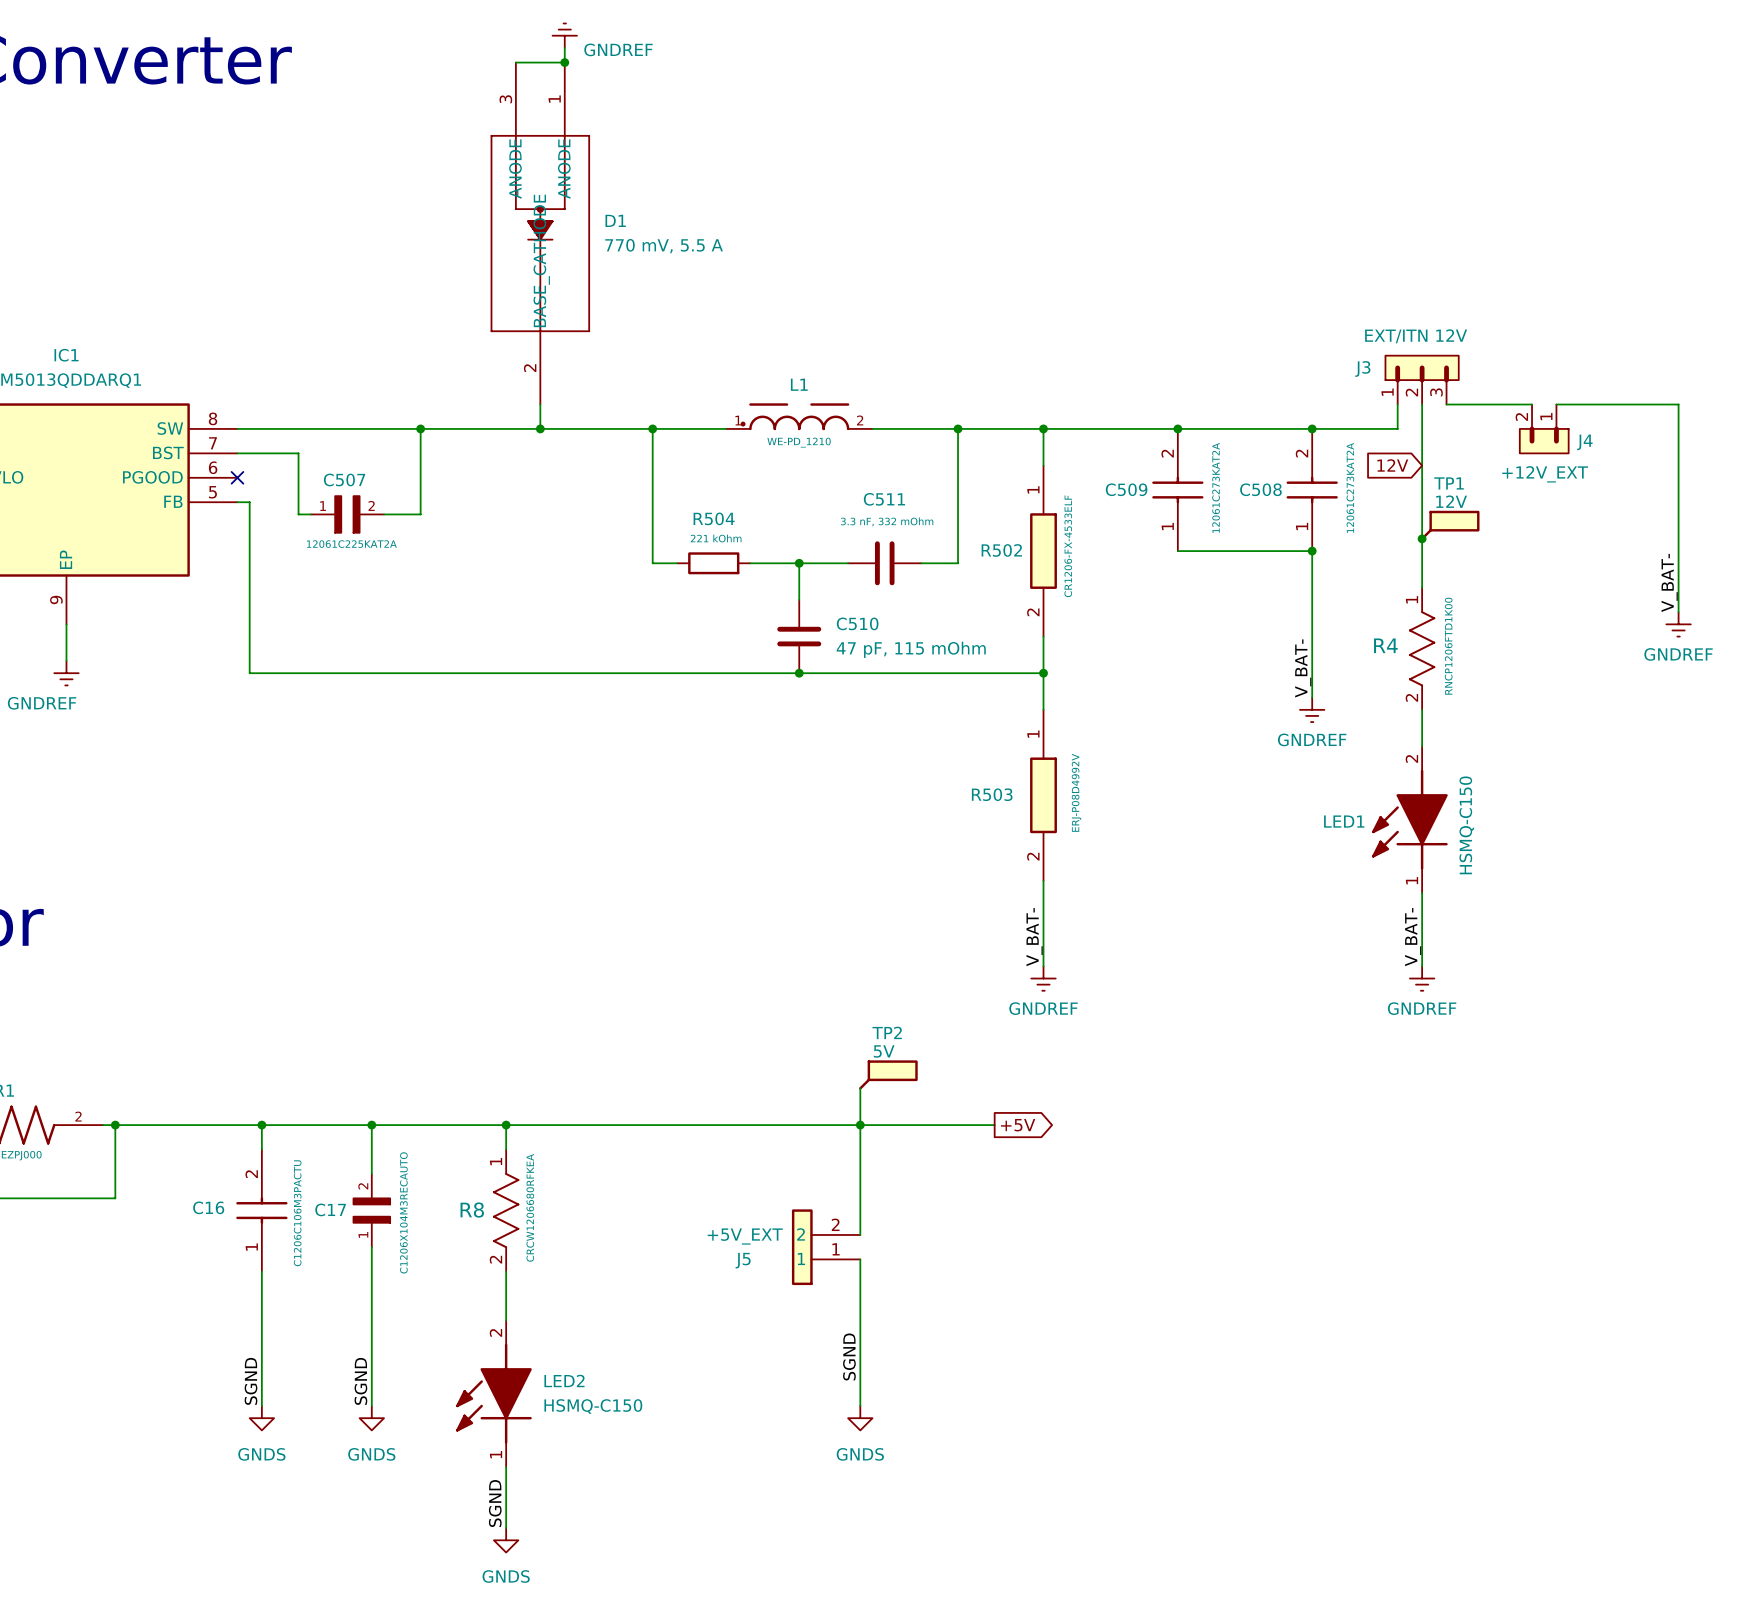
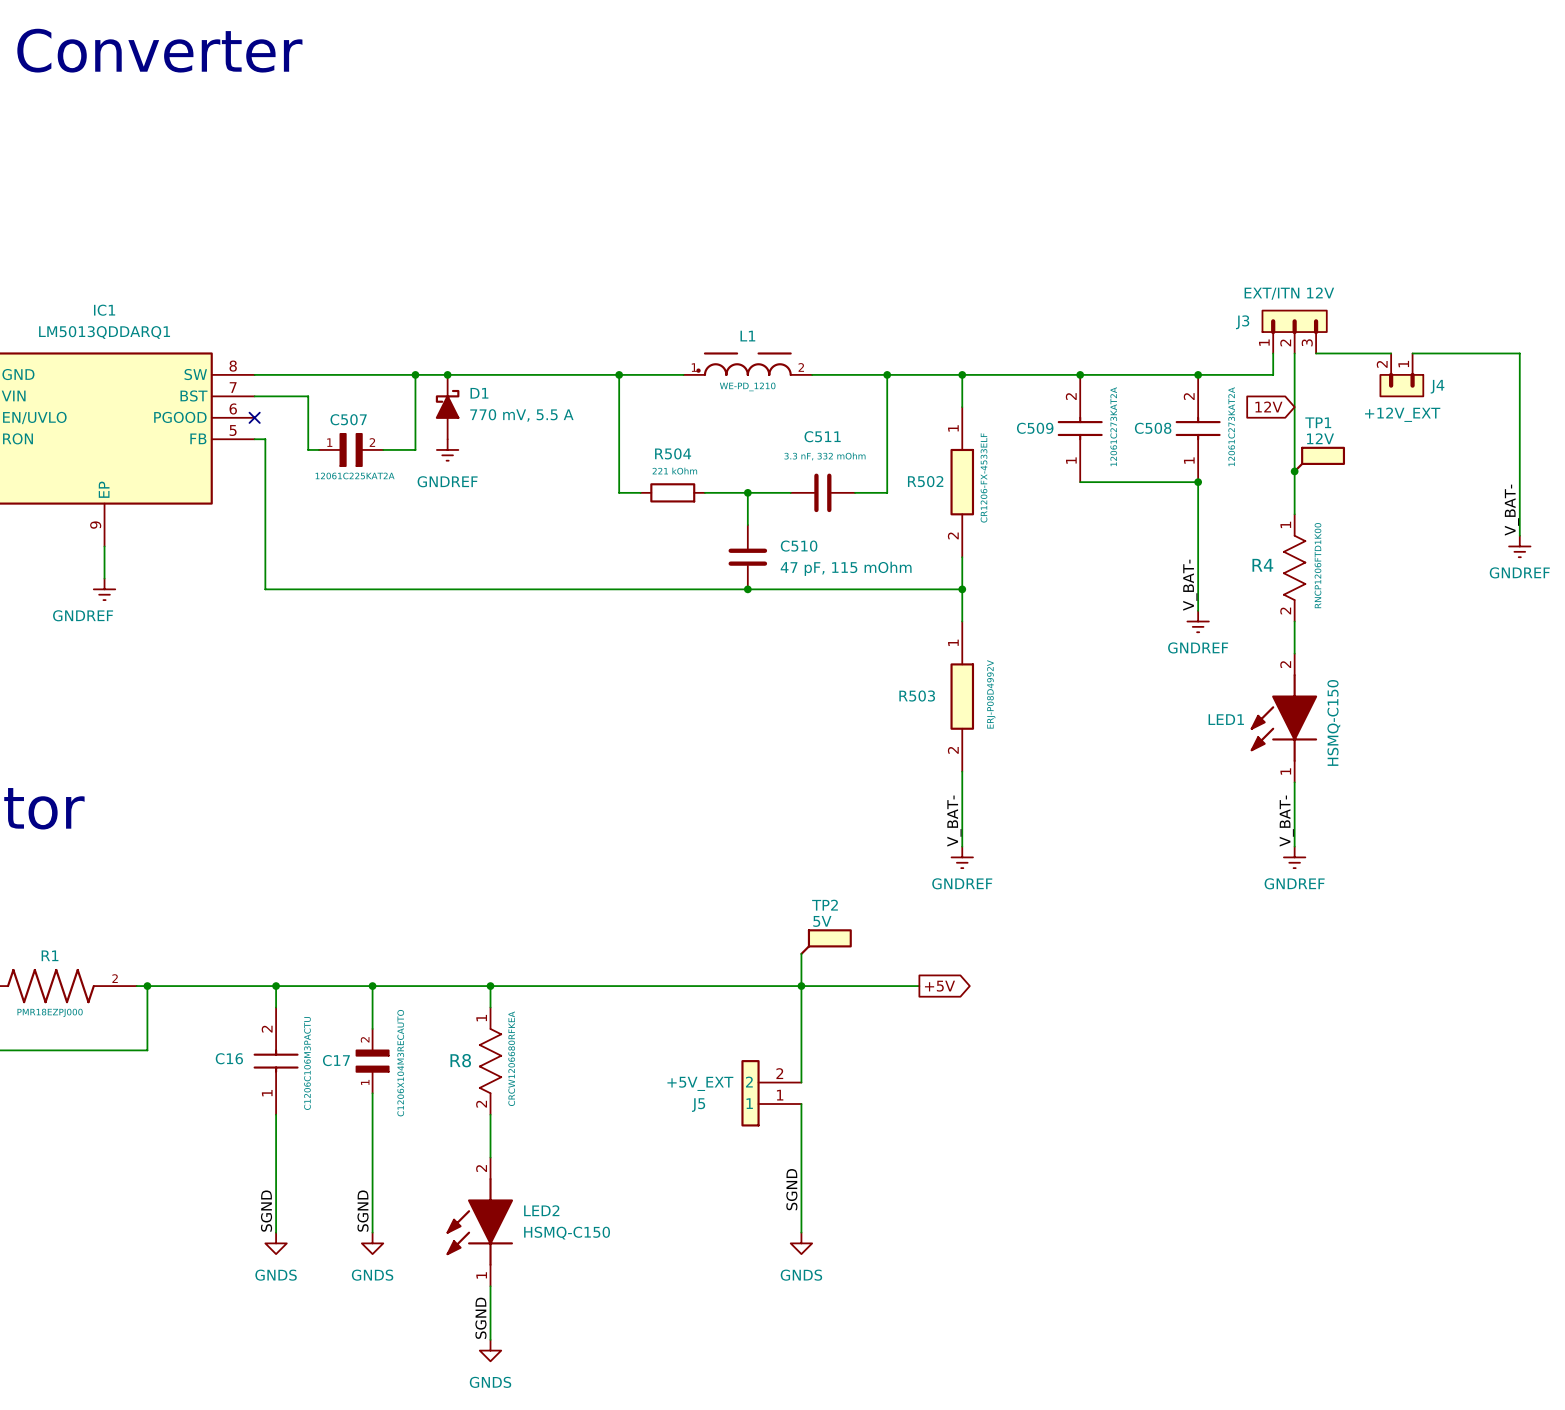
power symbol: GNDREF (564, 35) -> none
wire: (564, 47) (564, 62) (515, 62) -> none
D1 symbol: [490, 62, 590, 405] -> [435, 374, 460, 440]
junction: (564, 62) -> none
D1 name position: D1 (615, 220) -> D1 (479, 393)
D1 value position: 770 mV, 5.5 A (664, 246) -> 770 mV, 5.5 A (521, 415)
wire: (540, 404) (540, 428) -> none
junction: none -> (447, 374)
junction: (540, 428) -> none
power symbol: none -> GNDREF (447, 449)

